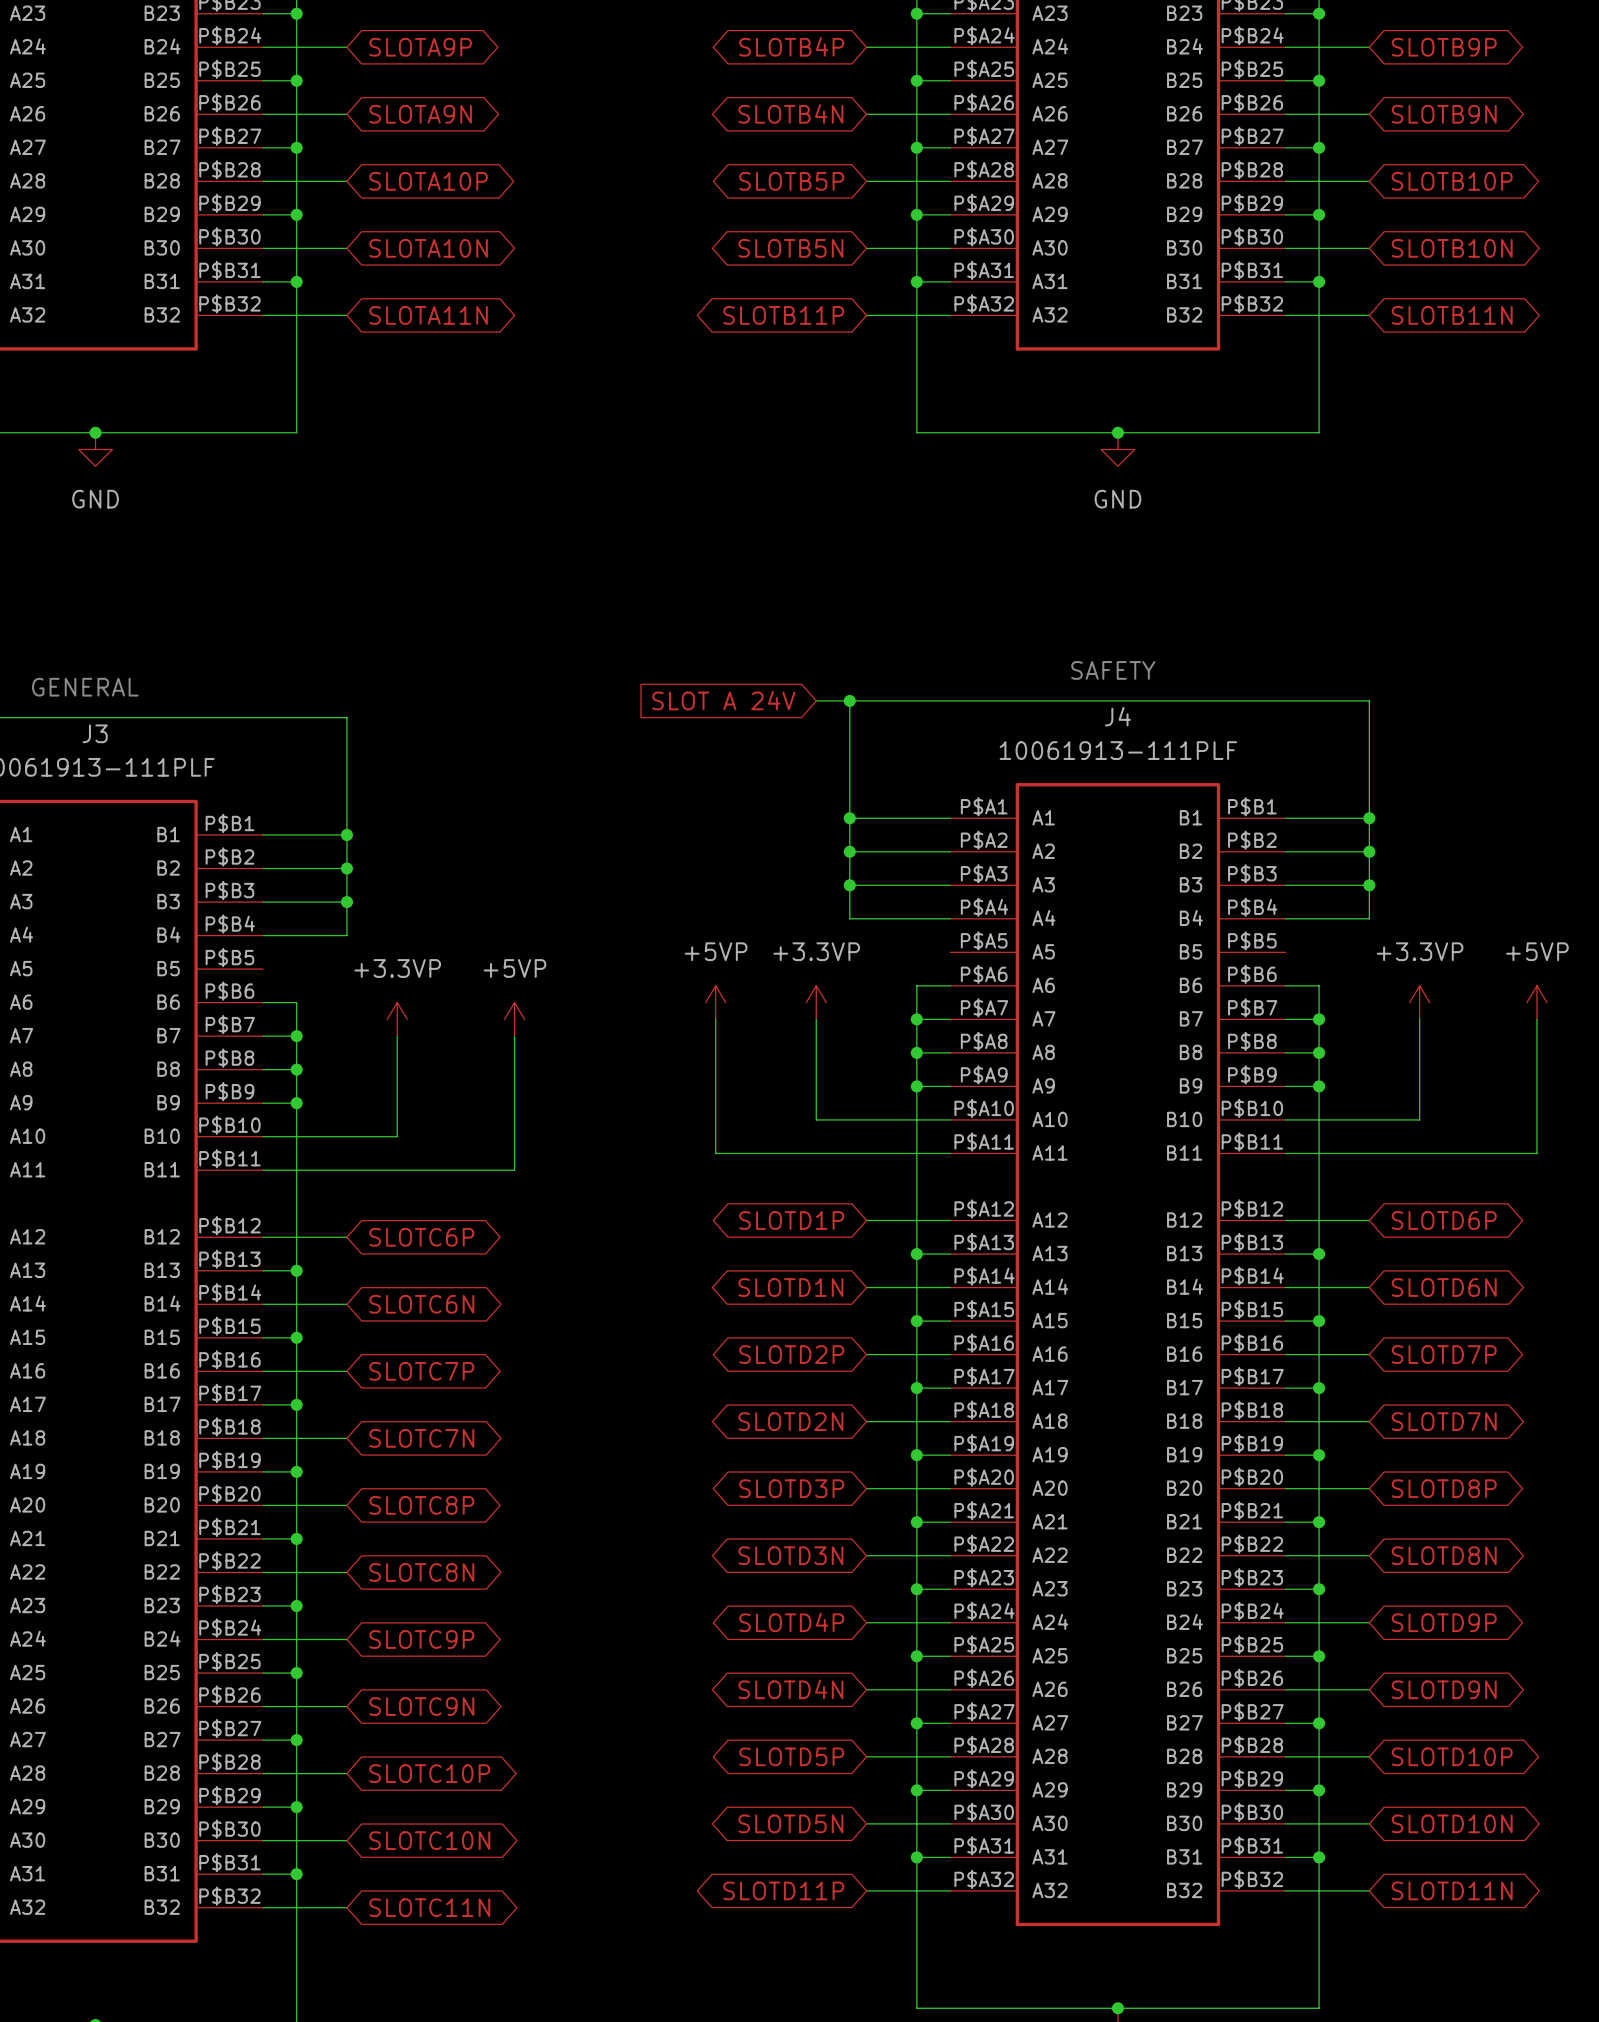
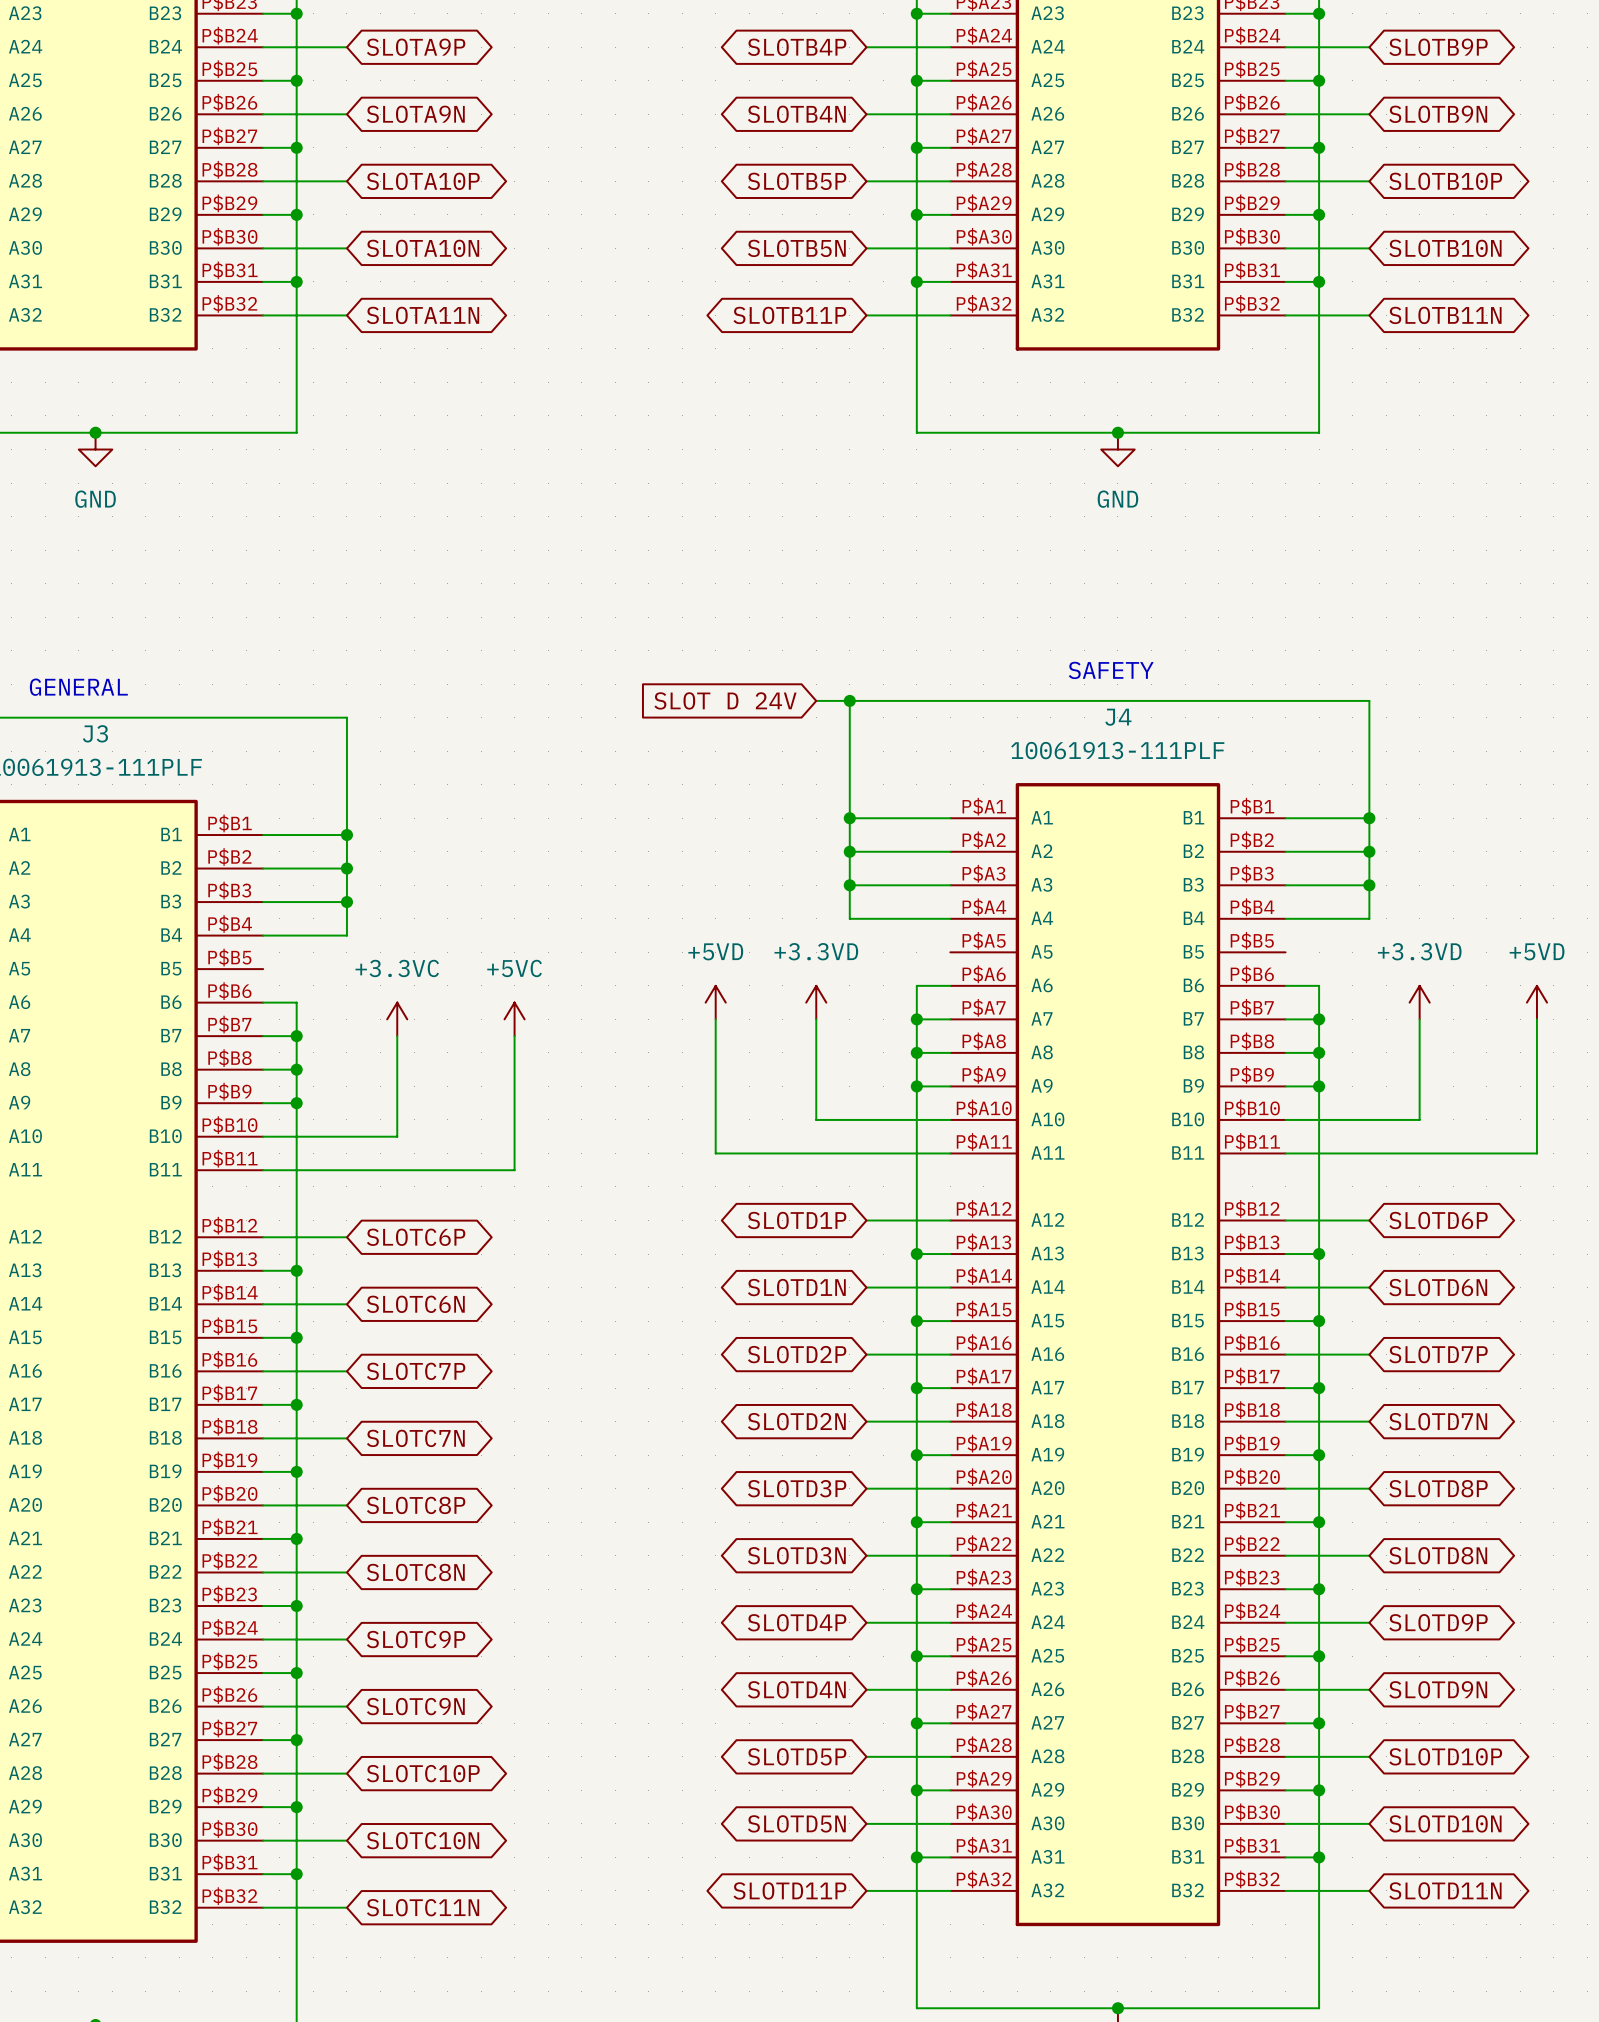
global label: SLOT A 24V (723, 700) -> SLOT D 24V (725, 700)
power symbol: +5VP (715, 1002) -> +5VD (715, 1002)
power symbol: +3.3VP (816, 1002) -> +3.3VD (816, 1002)
power symbol: +3.3VP (1419, 1002) -> +3.3VD (1419, 1002)
power symbol: +5VP (1536, 1002) -> +5VD (1536, 1002)
power symbol: +3.3VP (397, 1019) -> +3.3VC (397, 1019)
power symbol: +5VP (514, 1019) -> +5VC (514, 1019)

